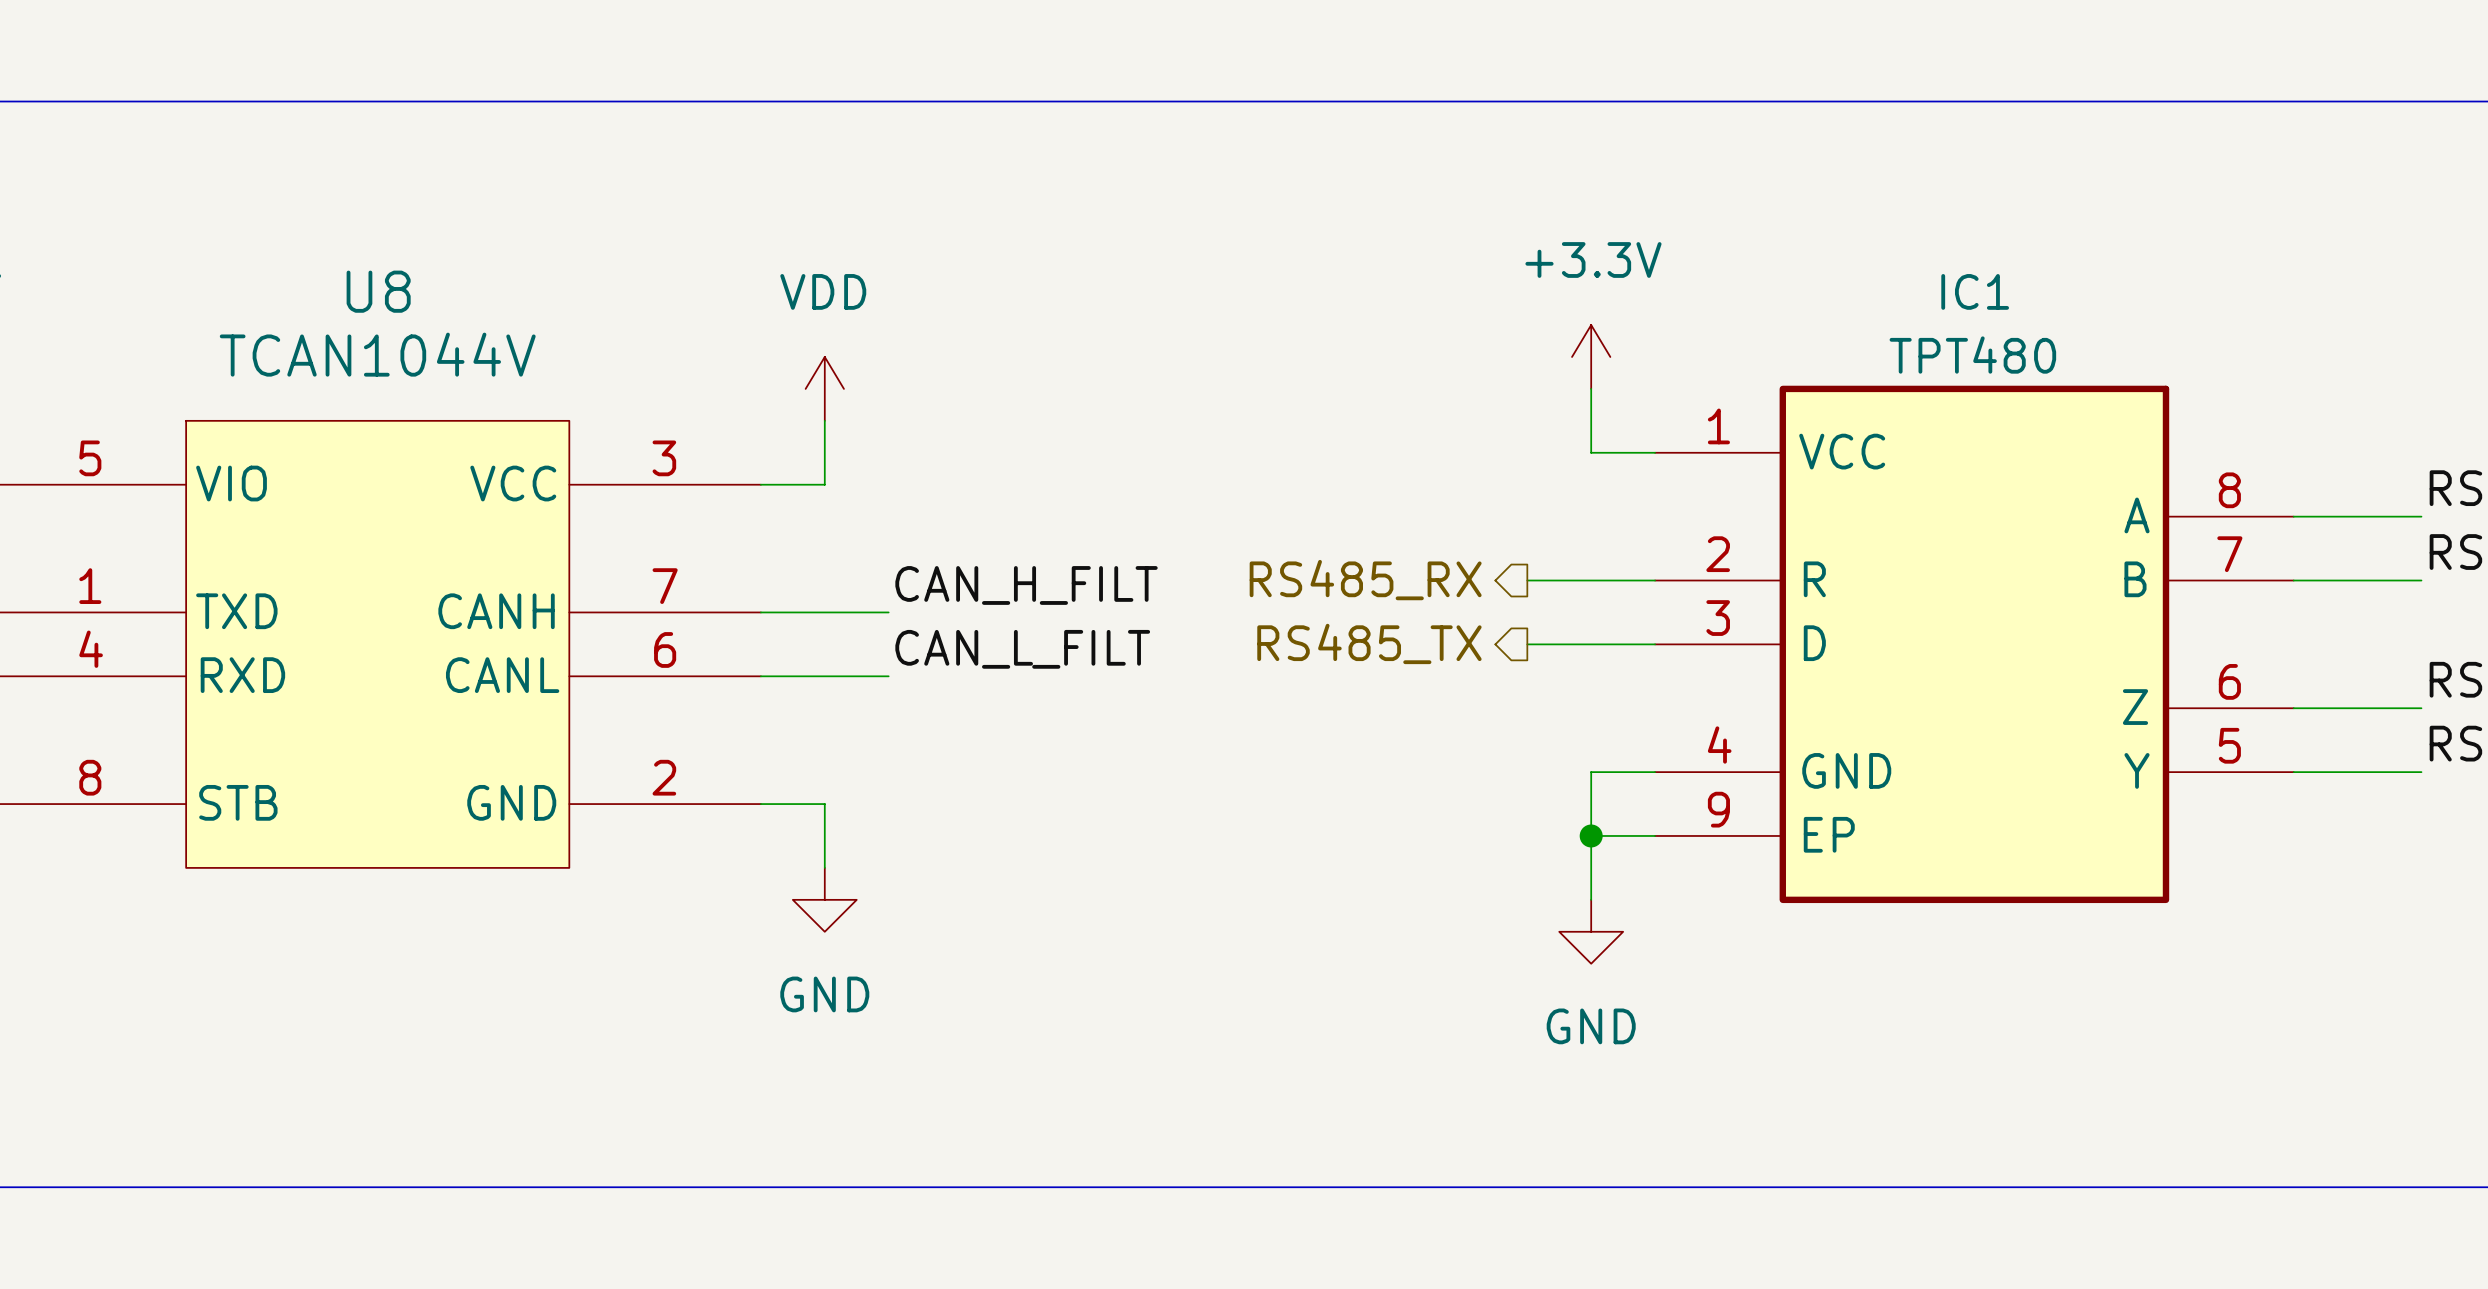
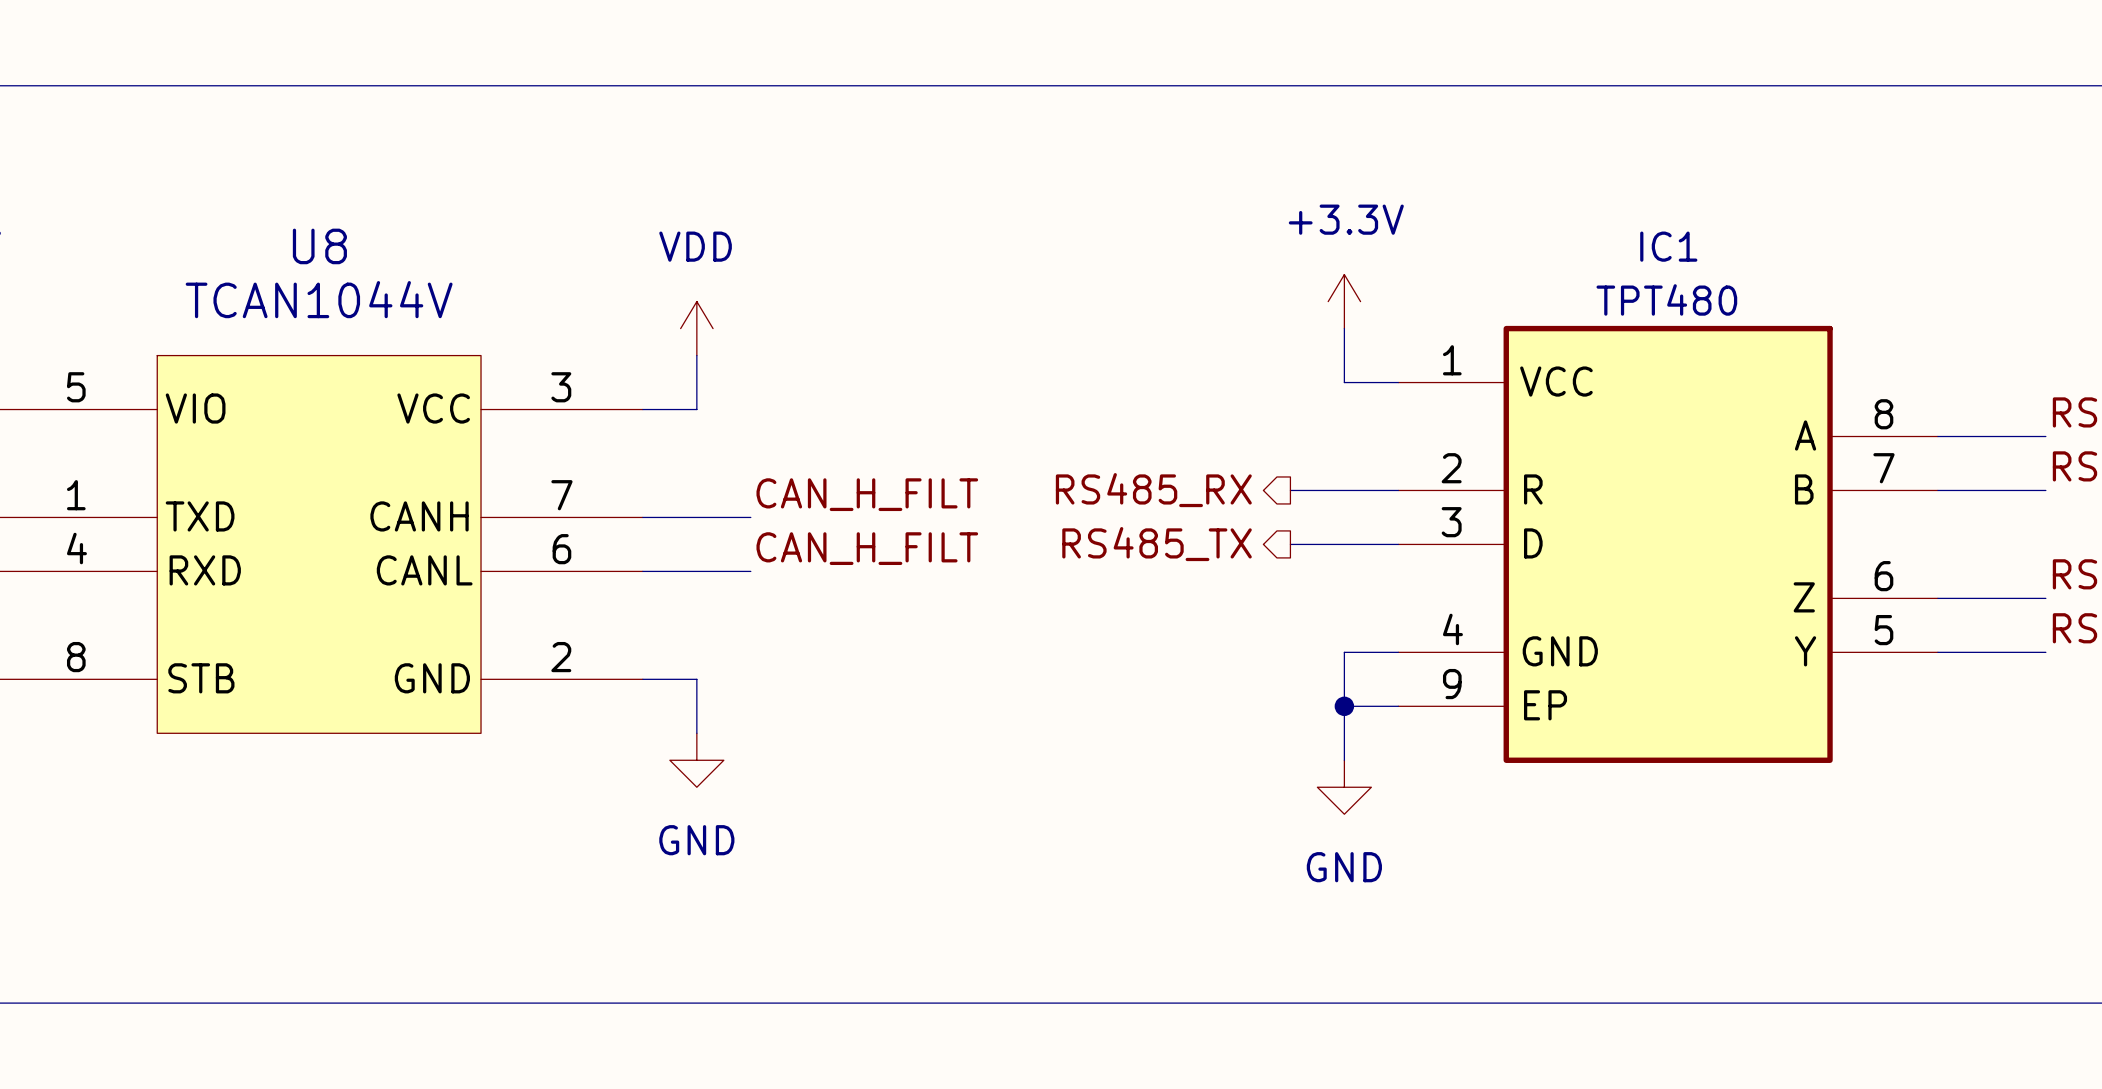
label: CAN_L_FILT (1022, 649) -> CAN_H_FILT (867, 548)

